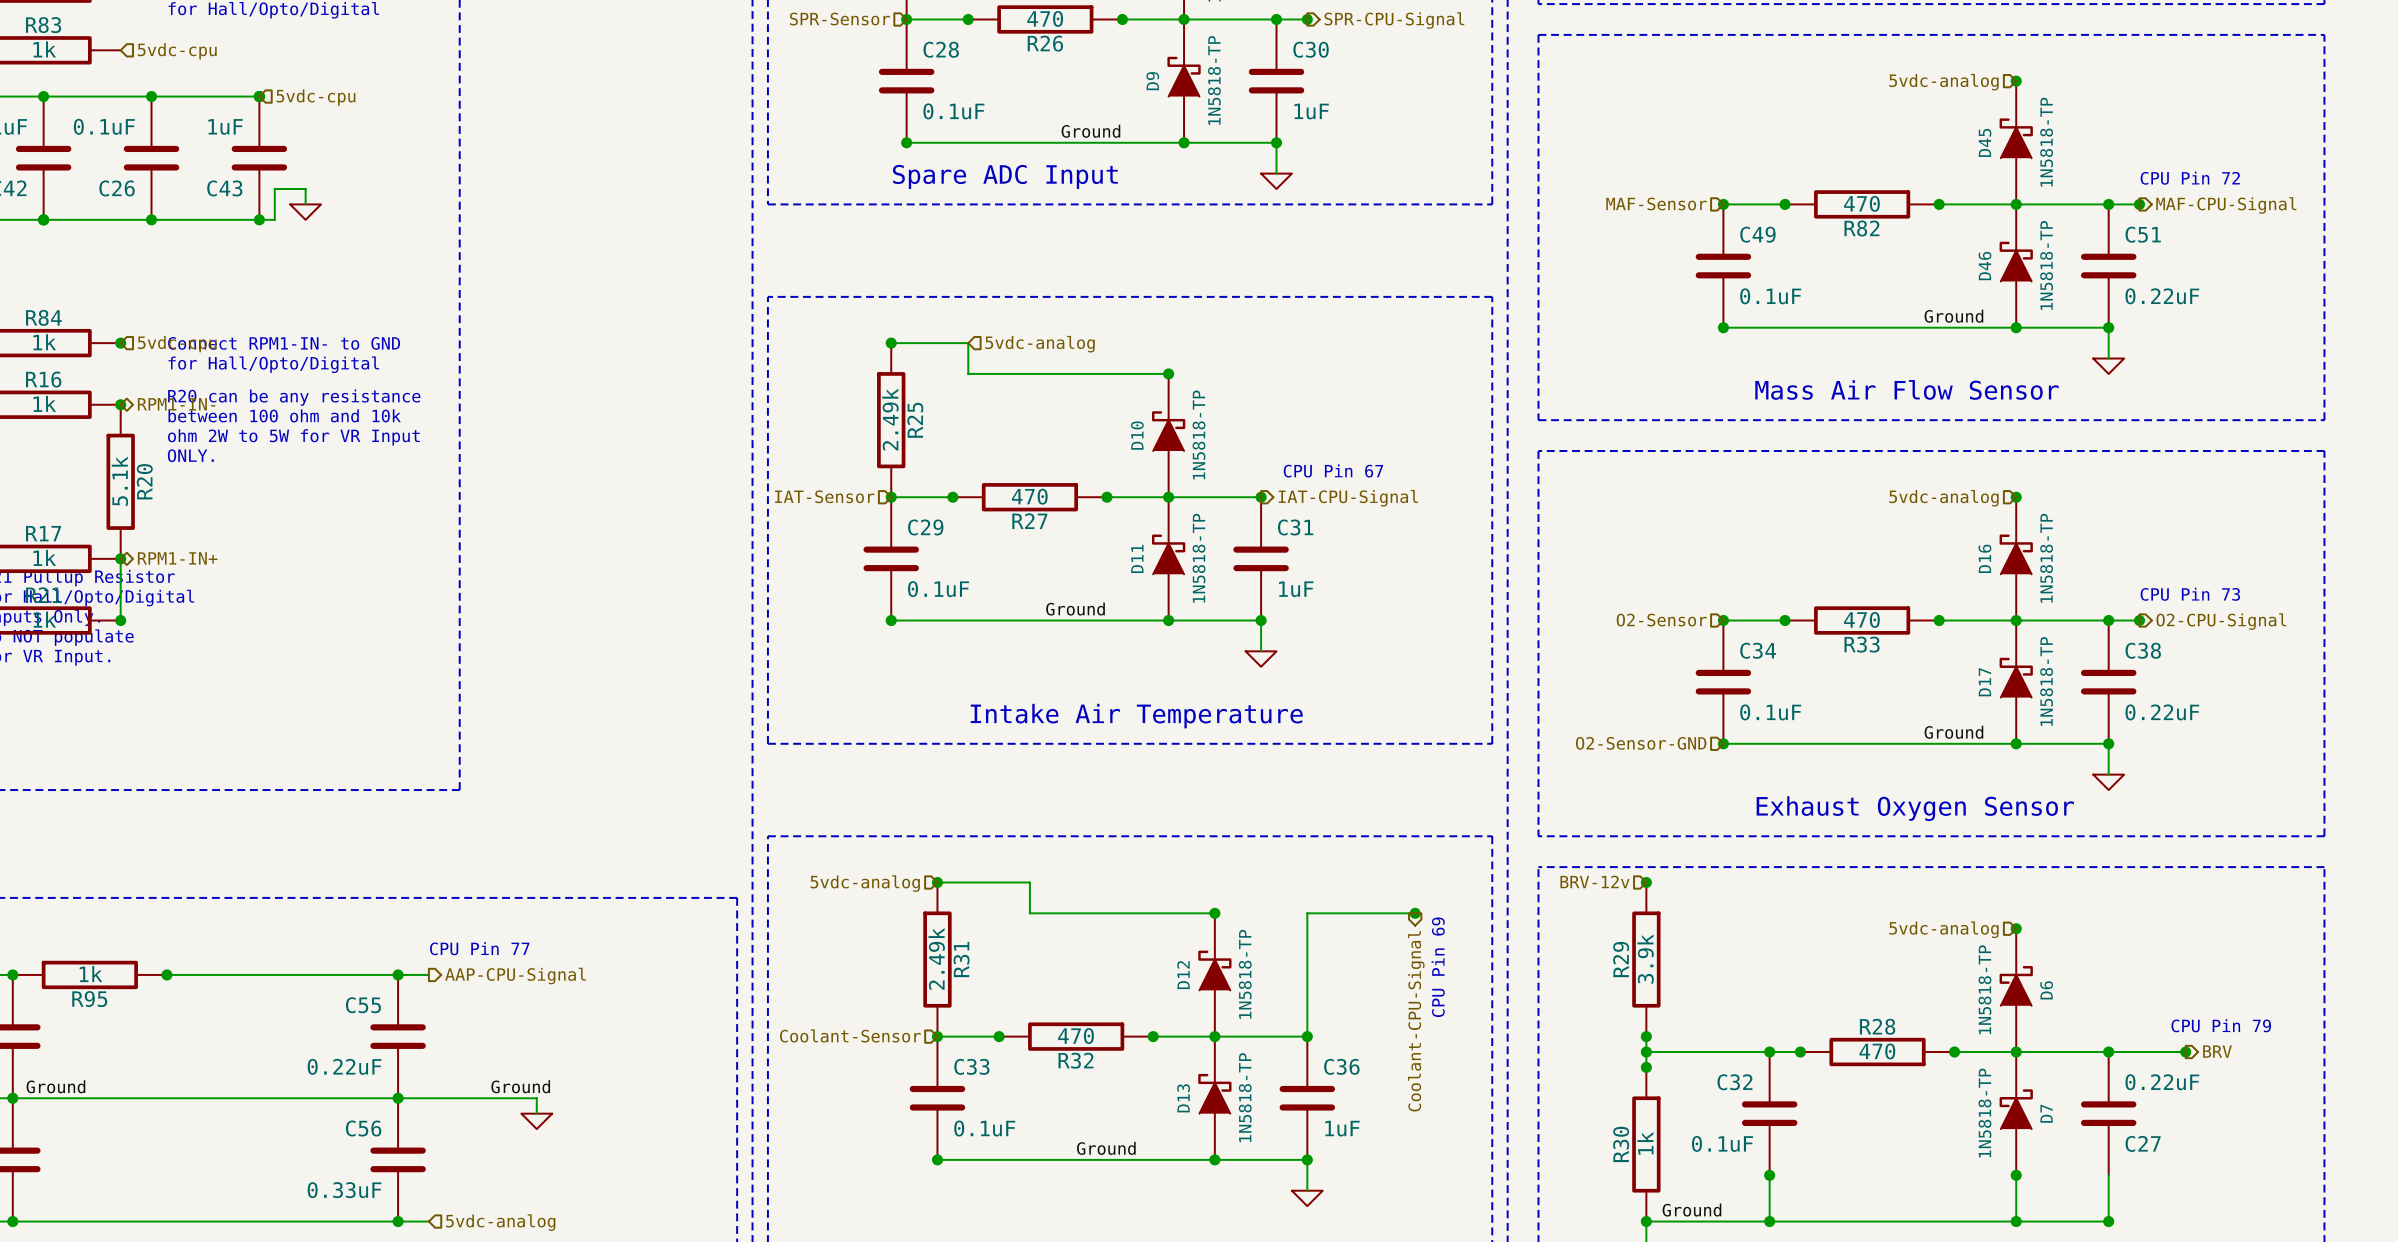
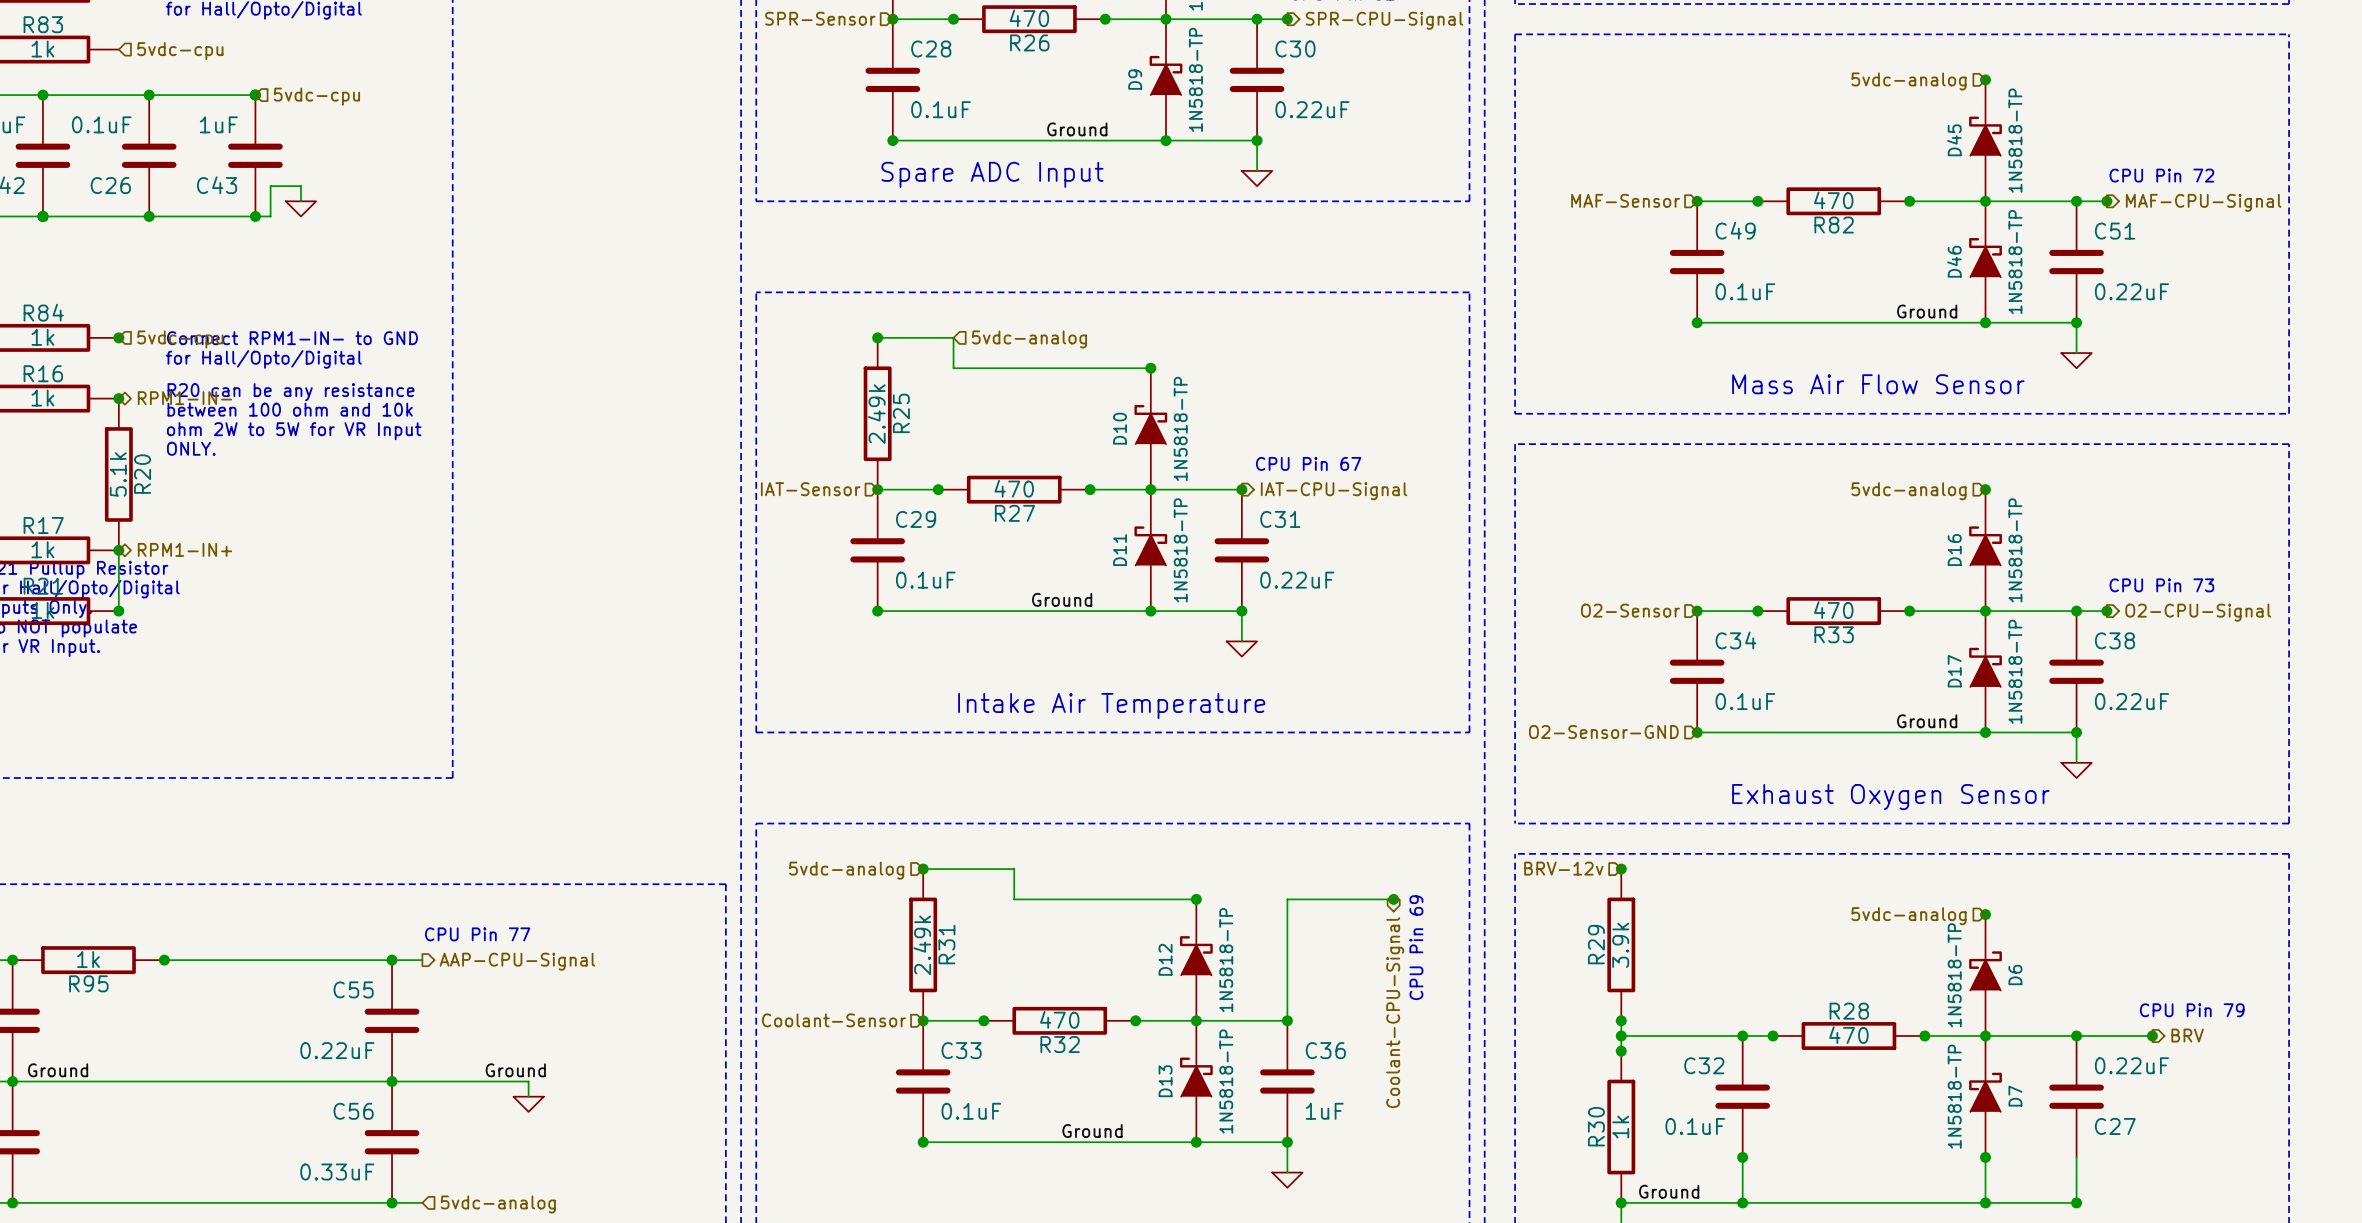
C30 value: 1uF (1311, 111) -> 0.22uF (1312, 109)
C31 value: 1uF (1296, 589) -> 0.22uF (1297, 580)

